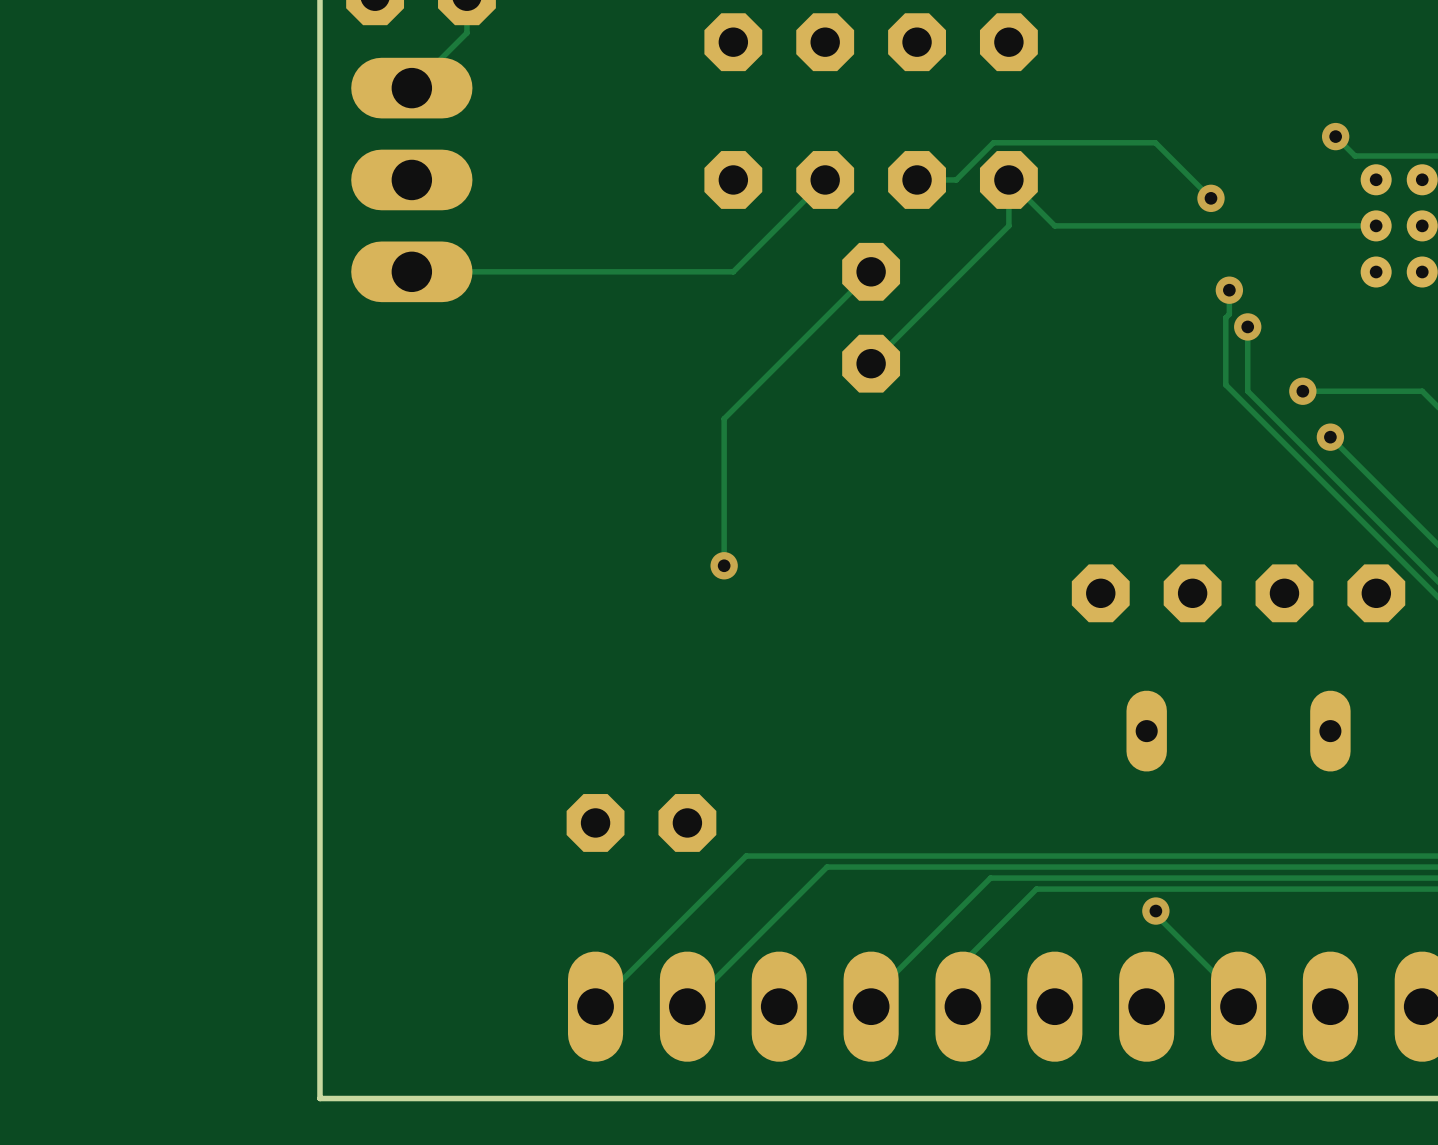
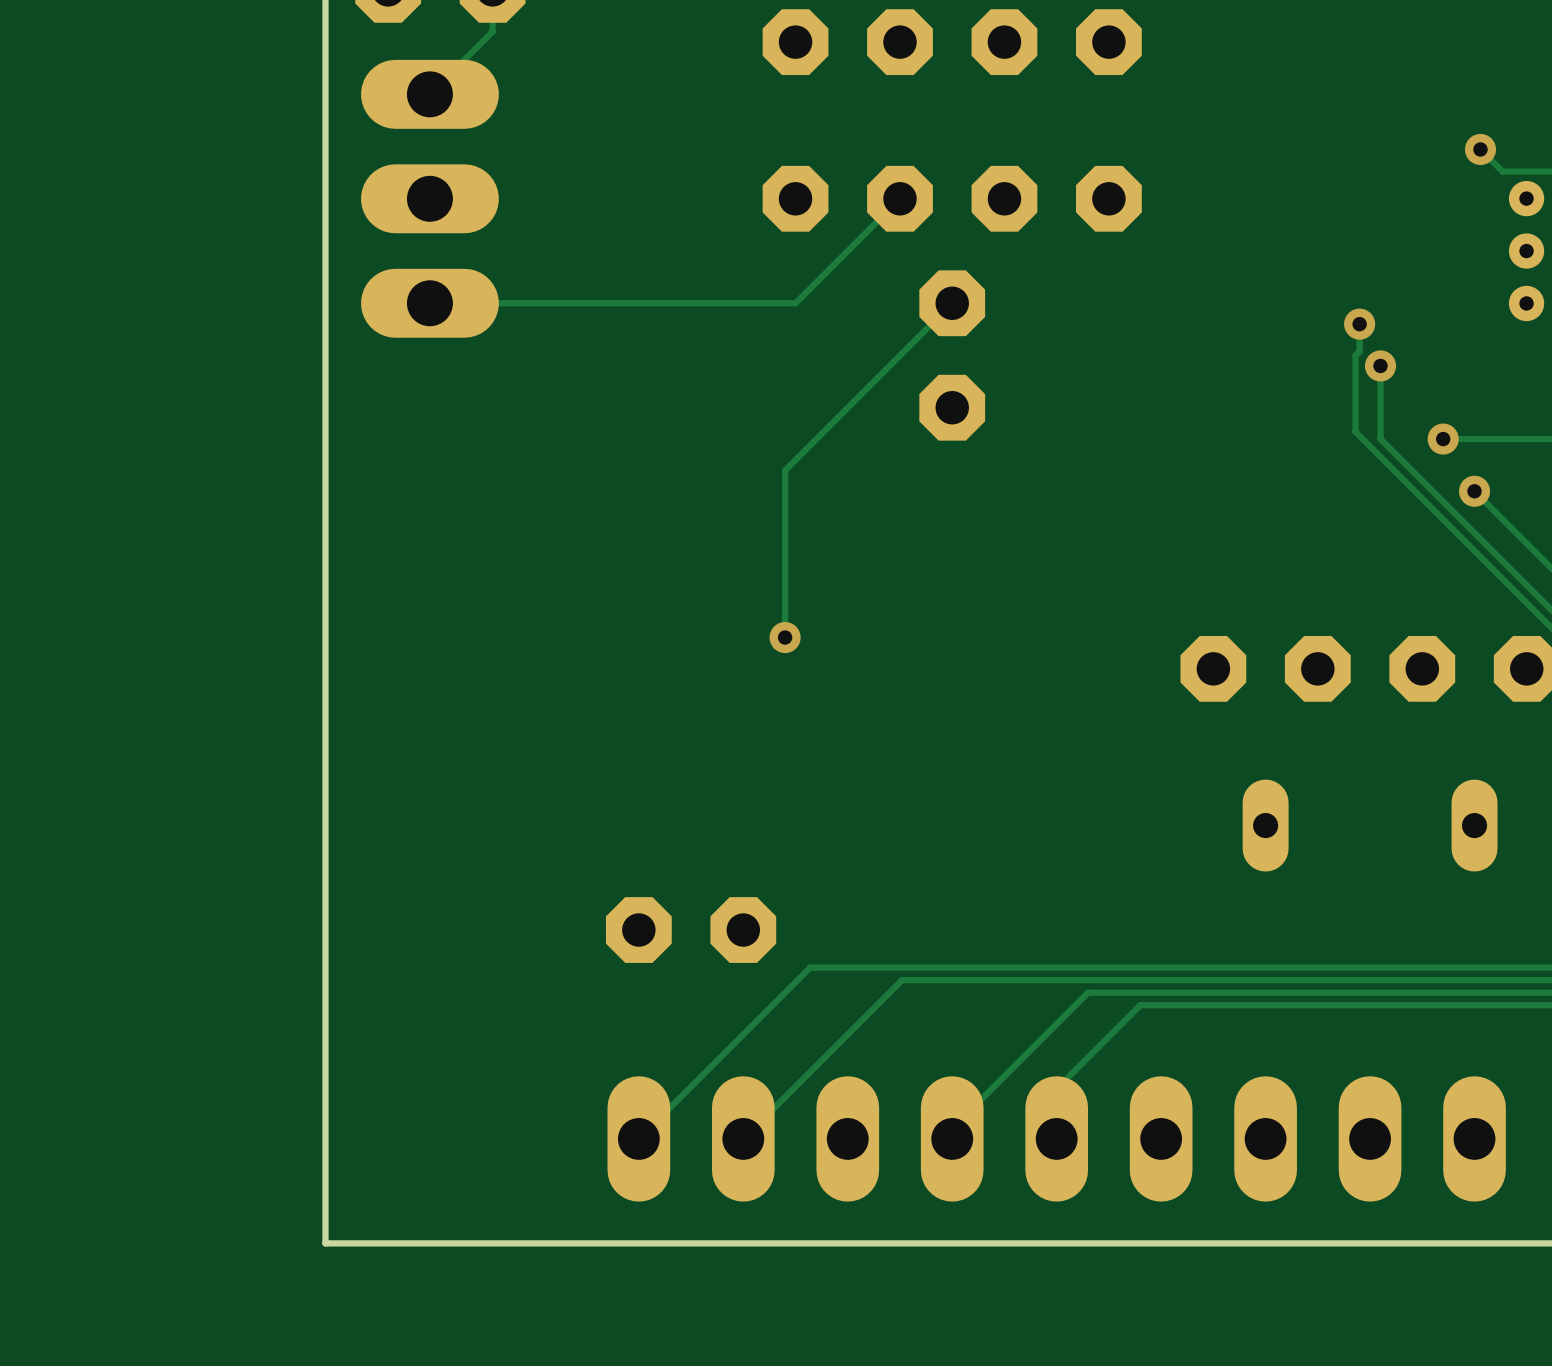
track: (917, 179) (956, 179) (993, 142) (1155, 142) (1210, 198) -> none
via: (1210, 198) -> none
track: (1376, 225) (1054, 225) (1008, 179) (1008, 225) (871, 363) -> none
track: (1155, 911) (1155, 914) (1238, 997) (1238, 1006) -> none
via: (1155, 911) -> none

